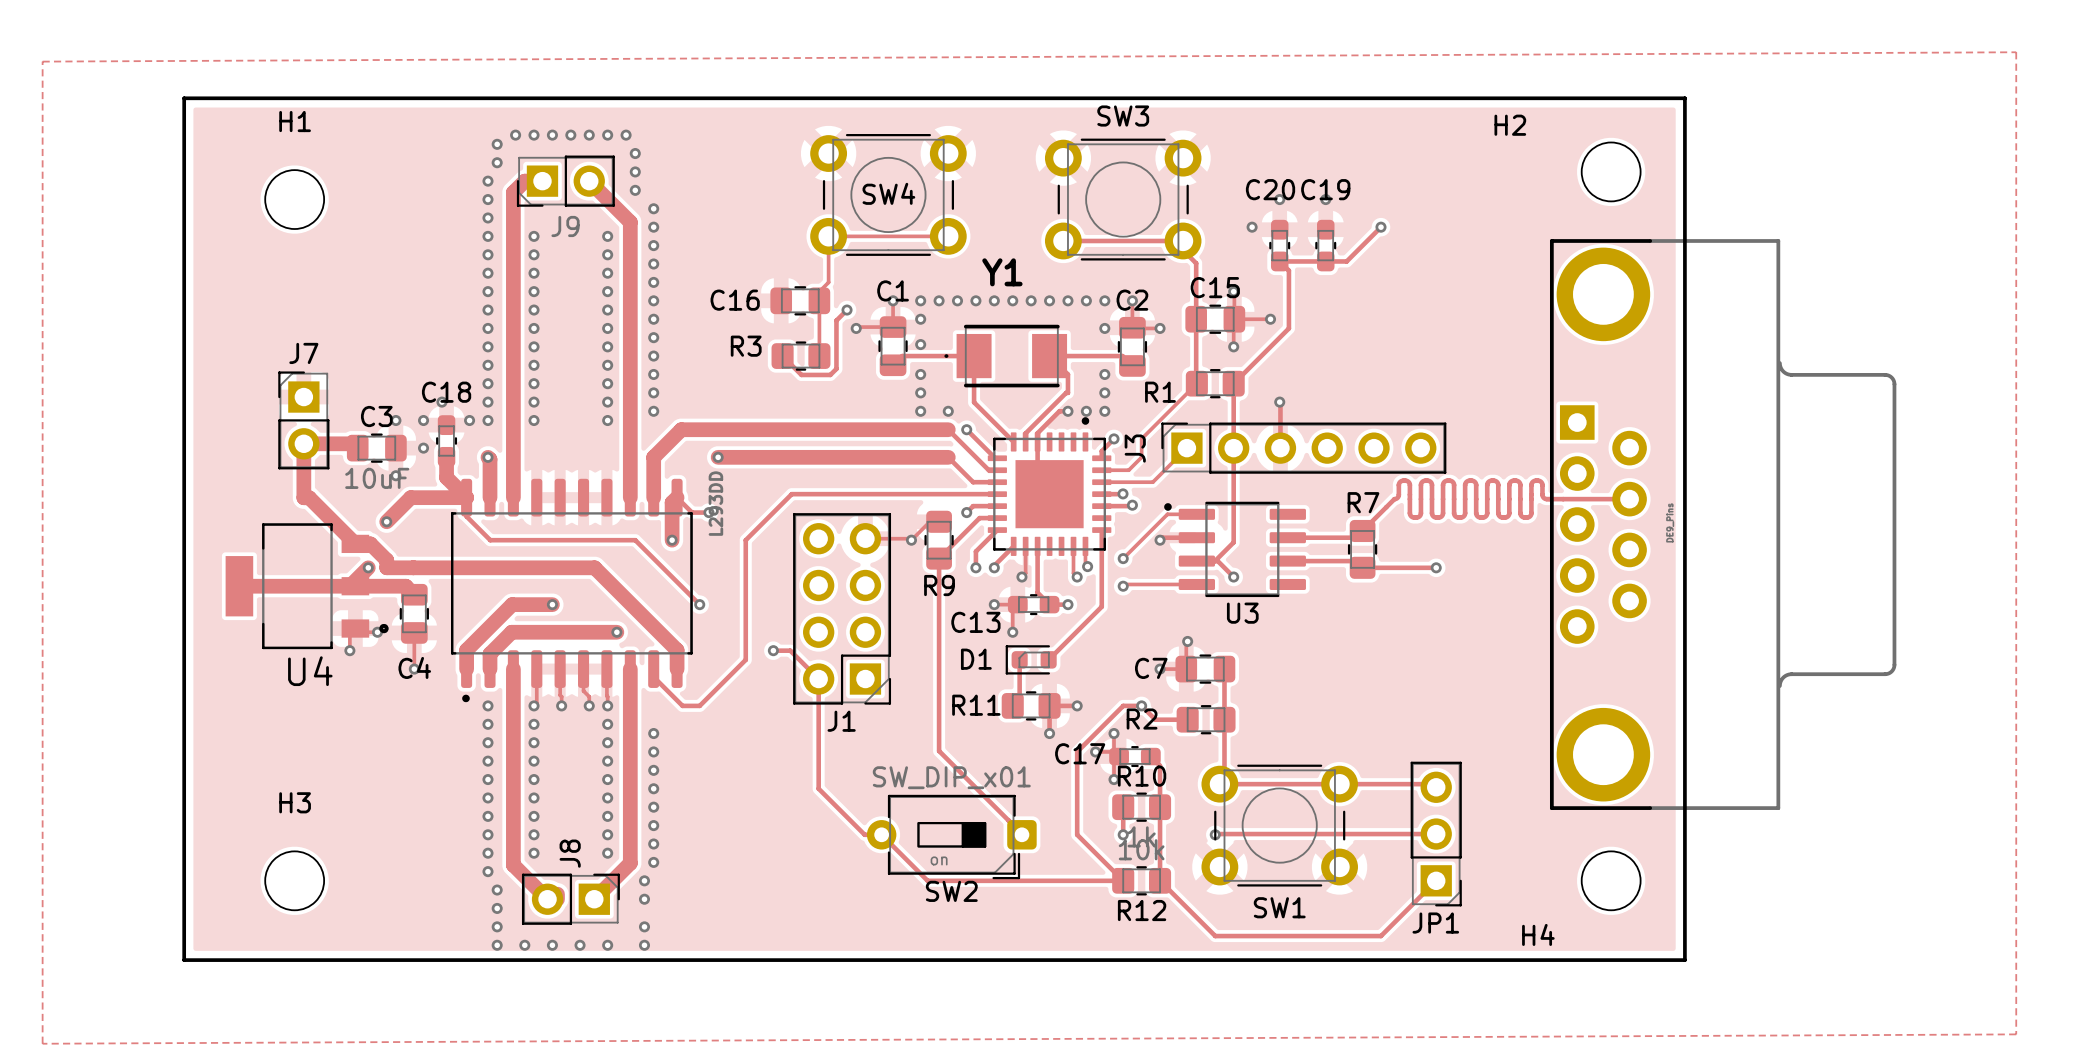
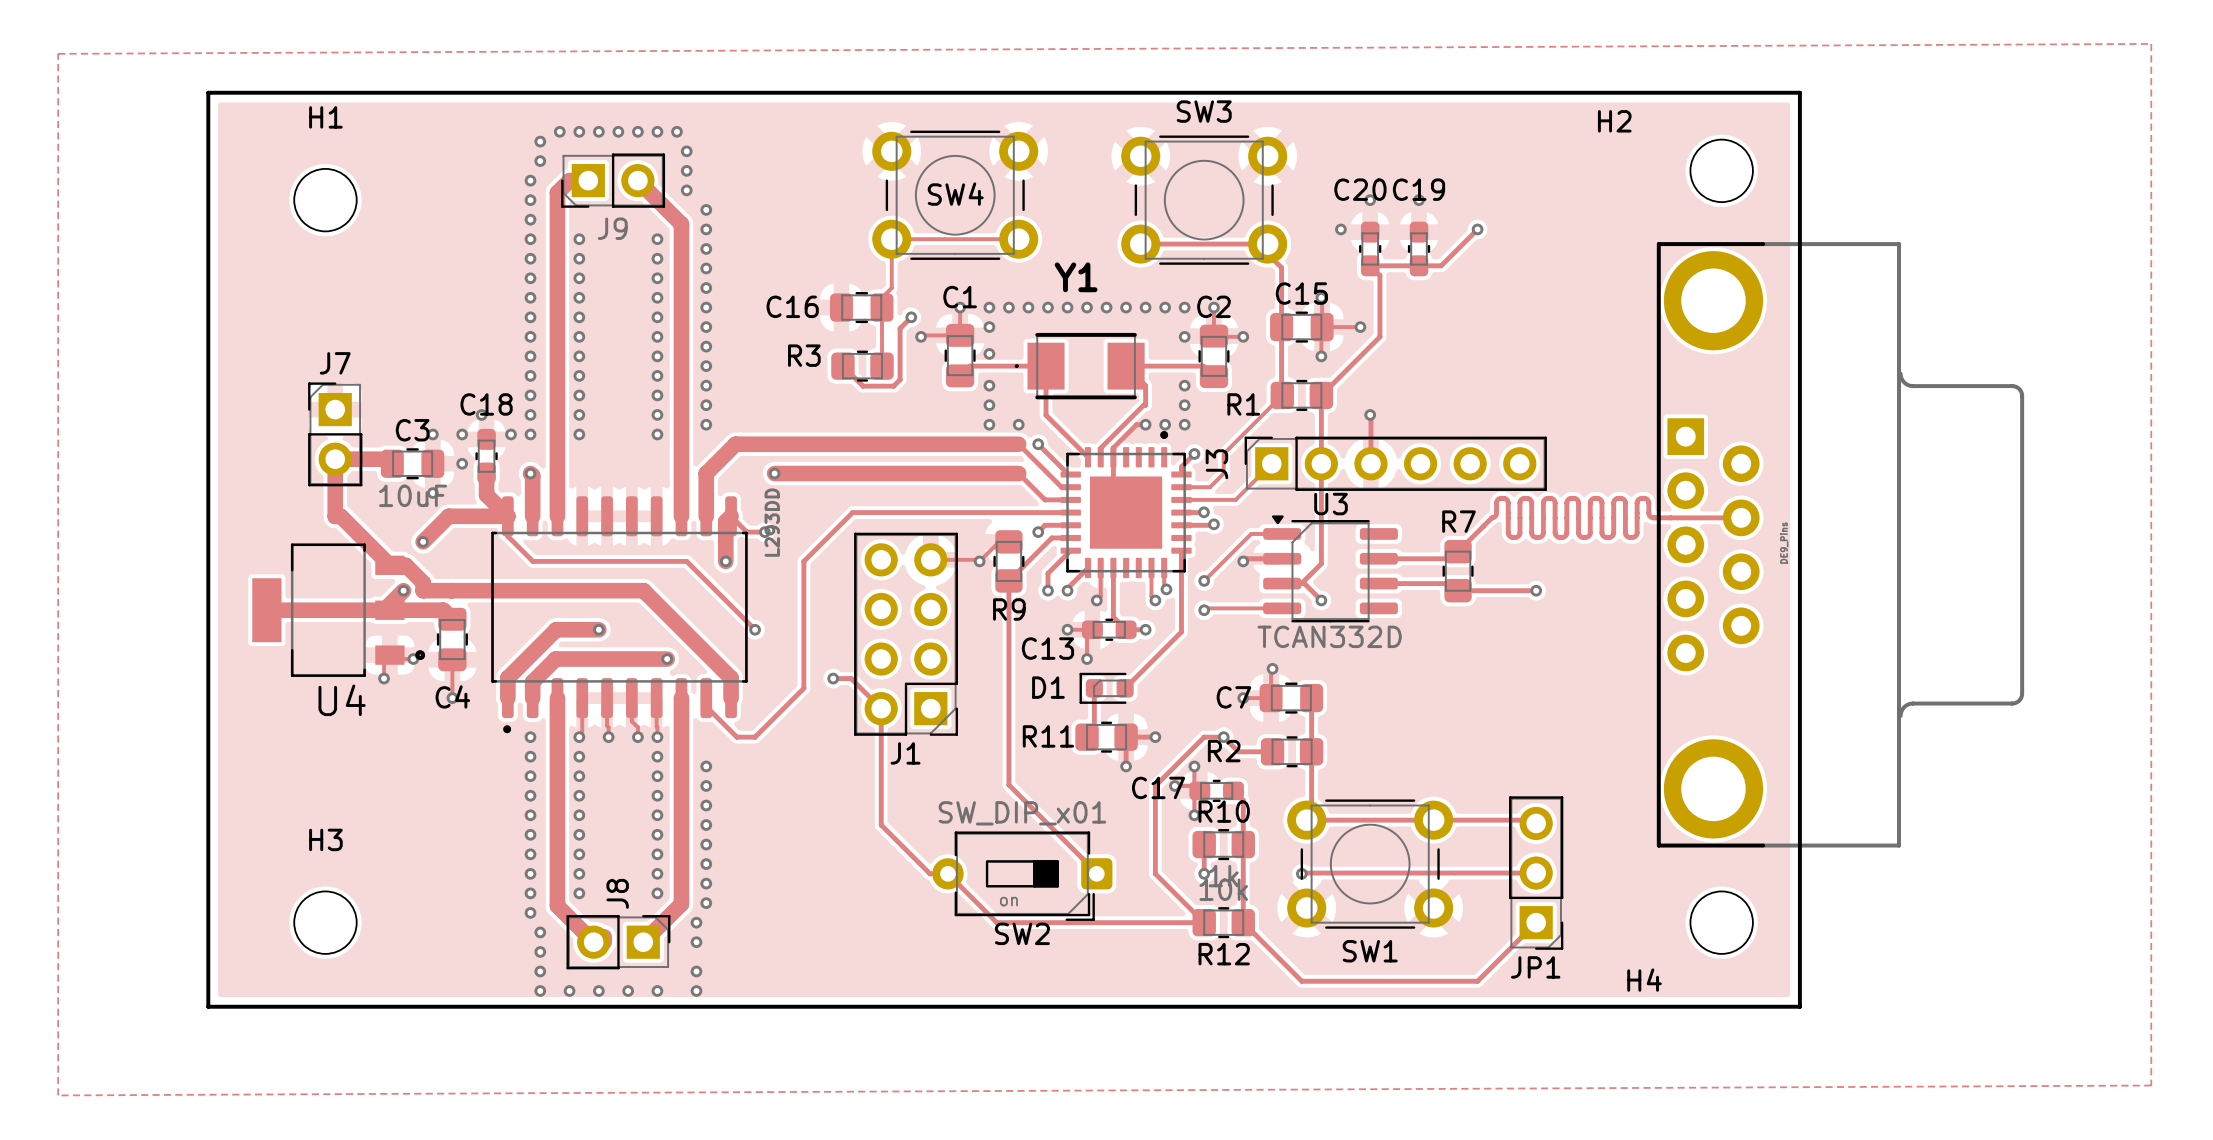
U3 footprint: [1164, 501, 1306, 598] -> [1263, 515, 1398, 623]
U3 value: none -> TCAN332D (1329, 636)
U3 name position: U3 (1242, 613) -> U3 (1331, 504)

